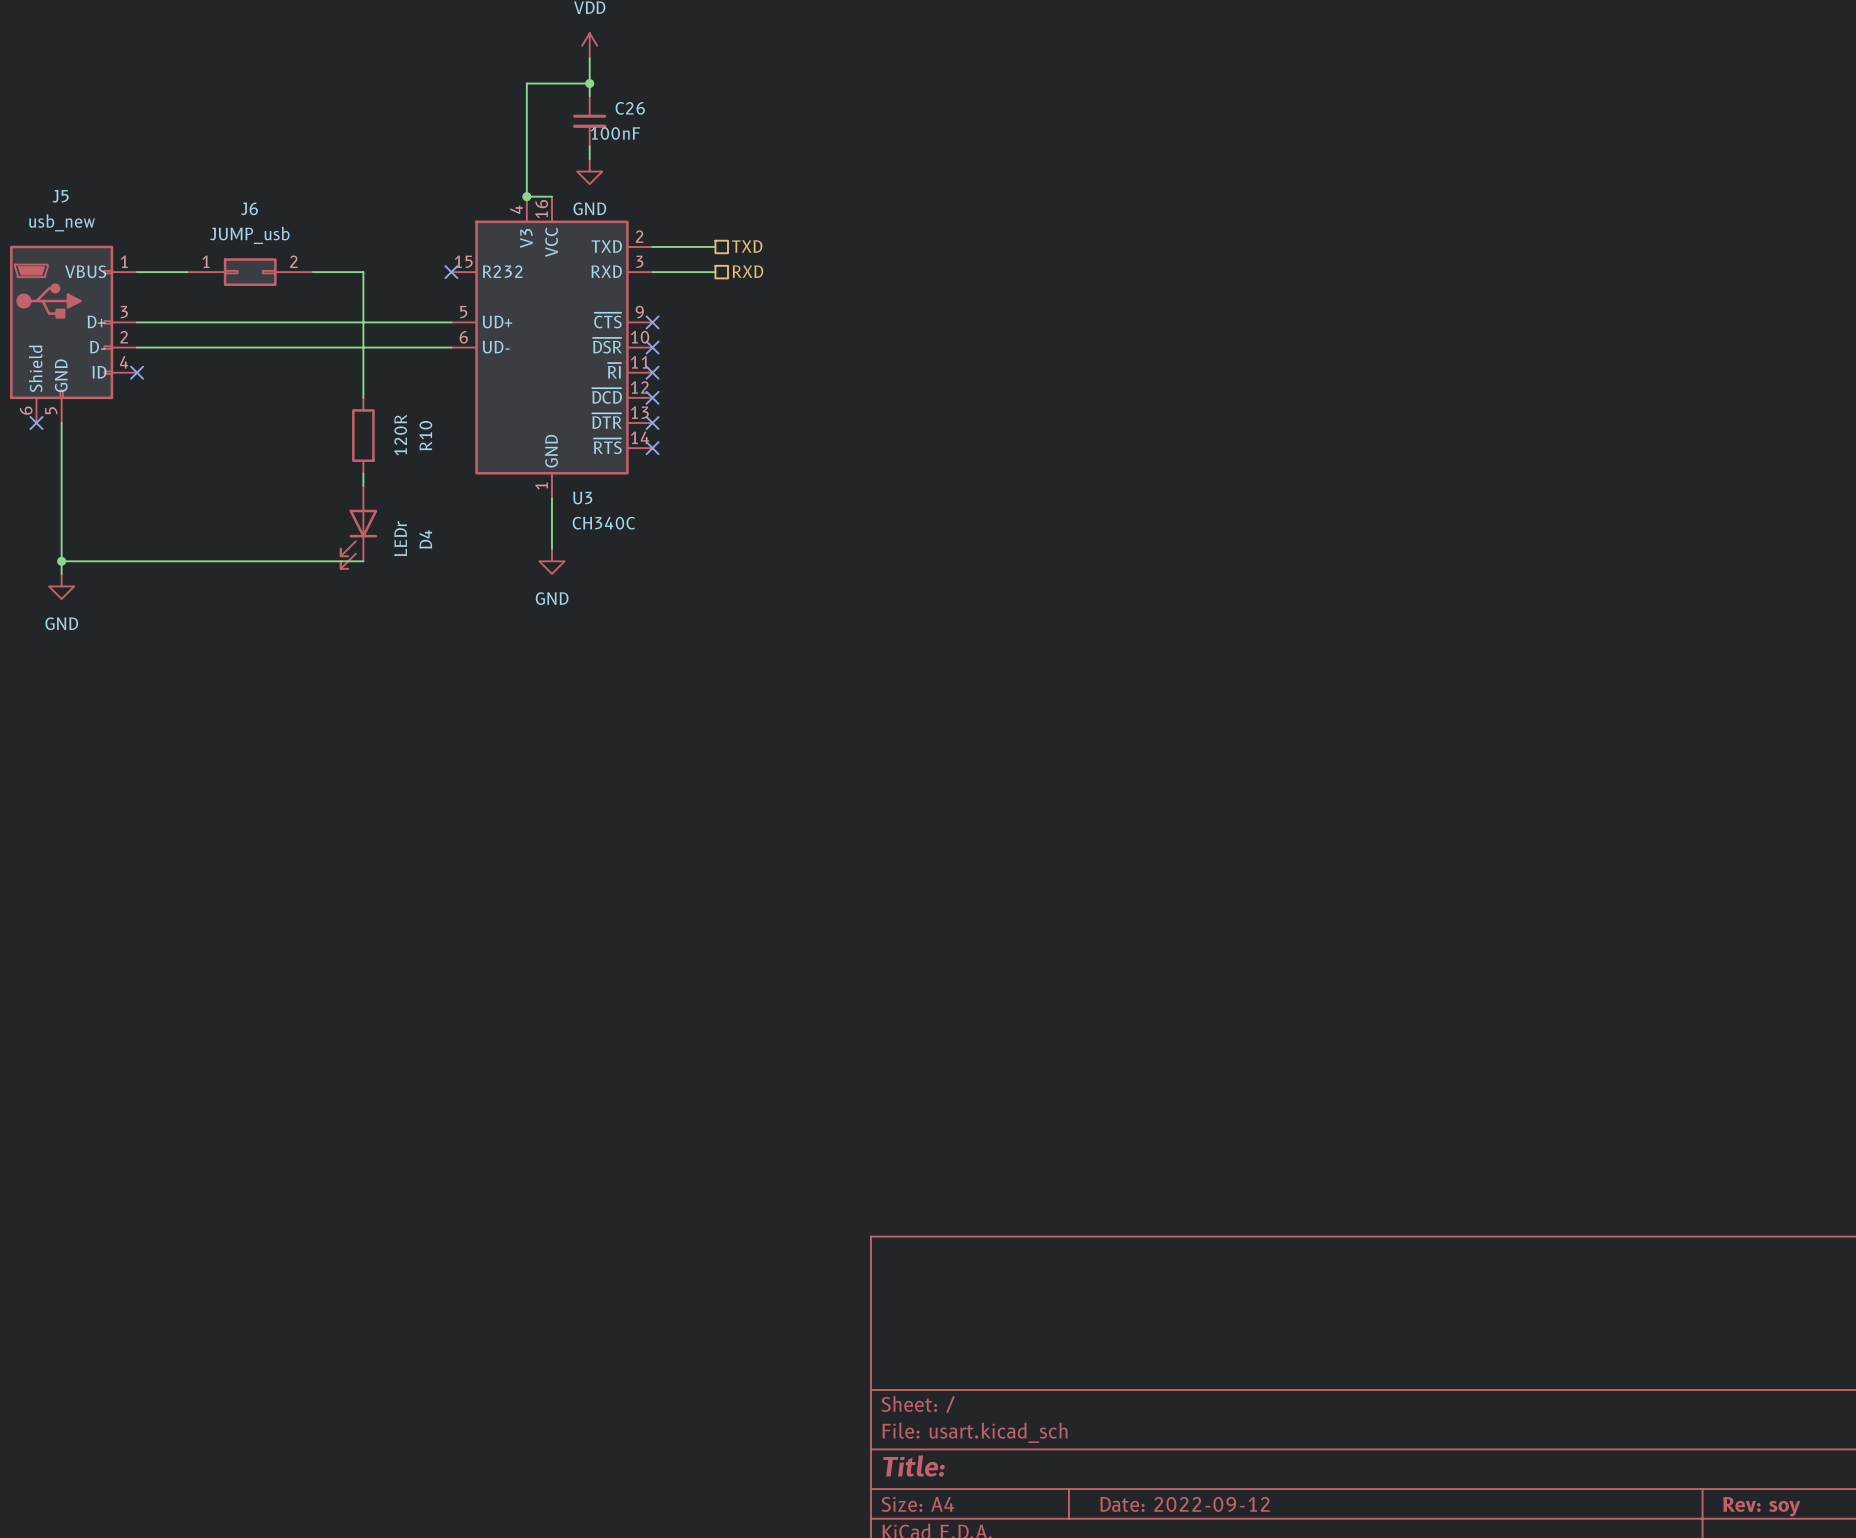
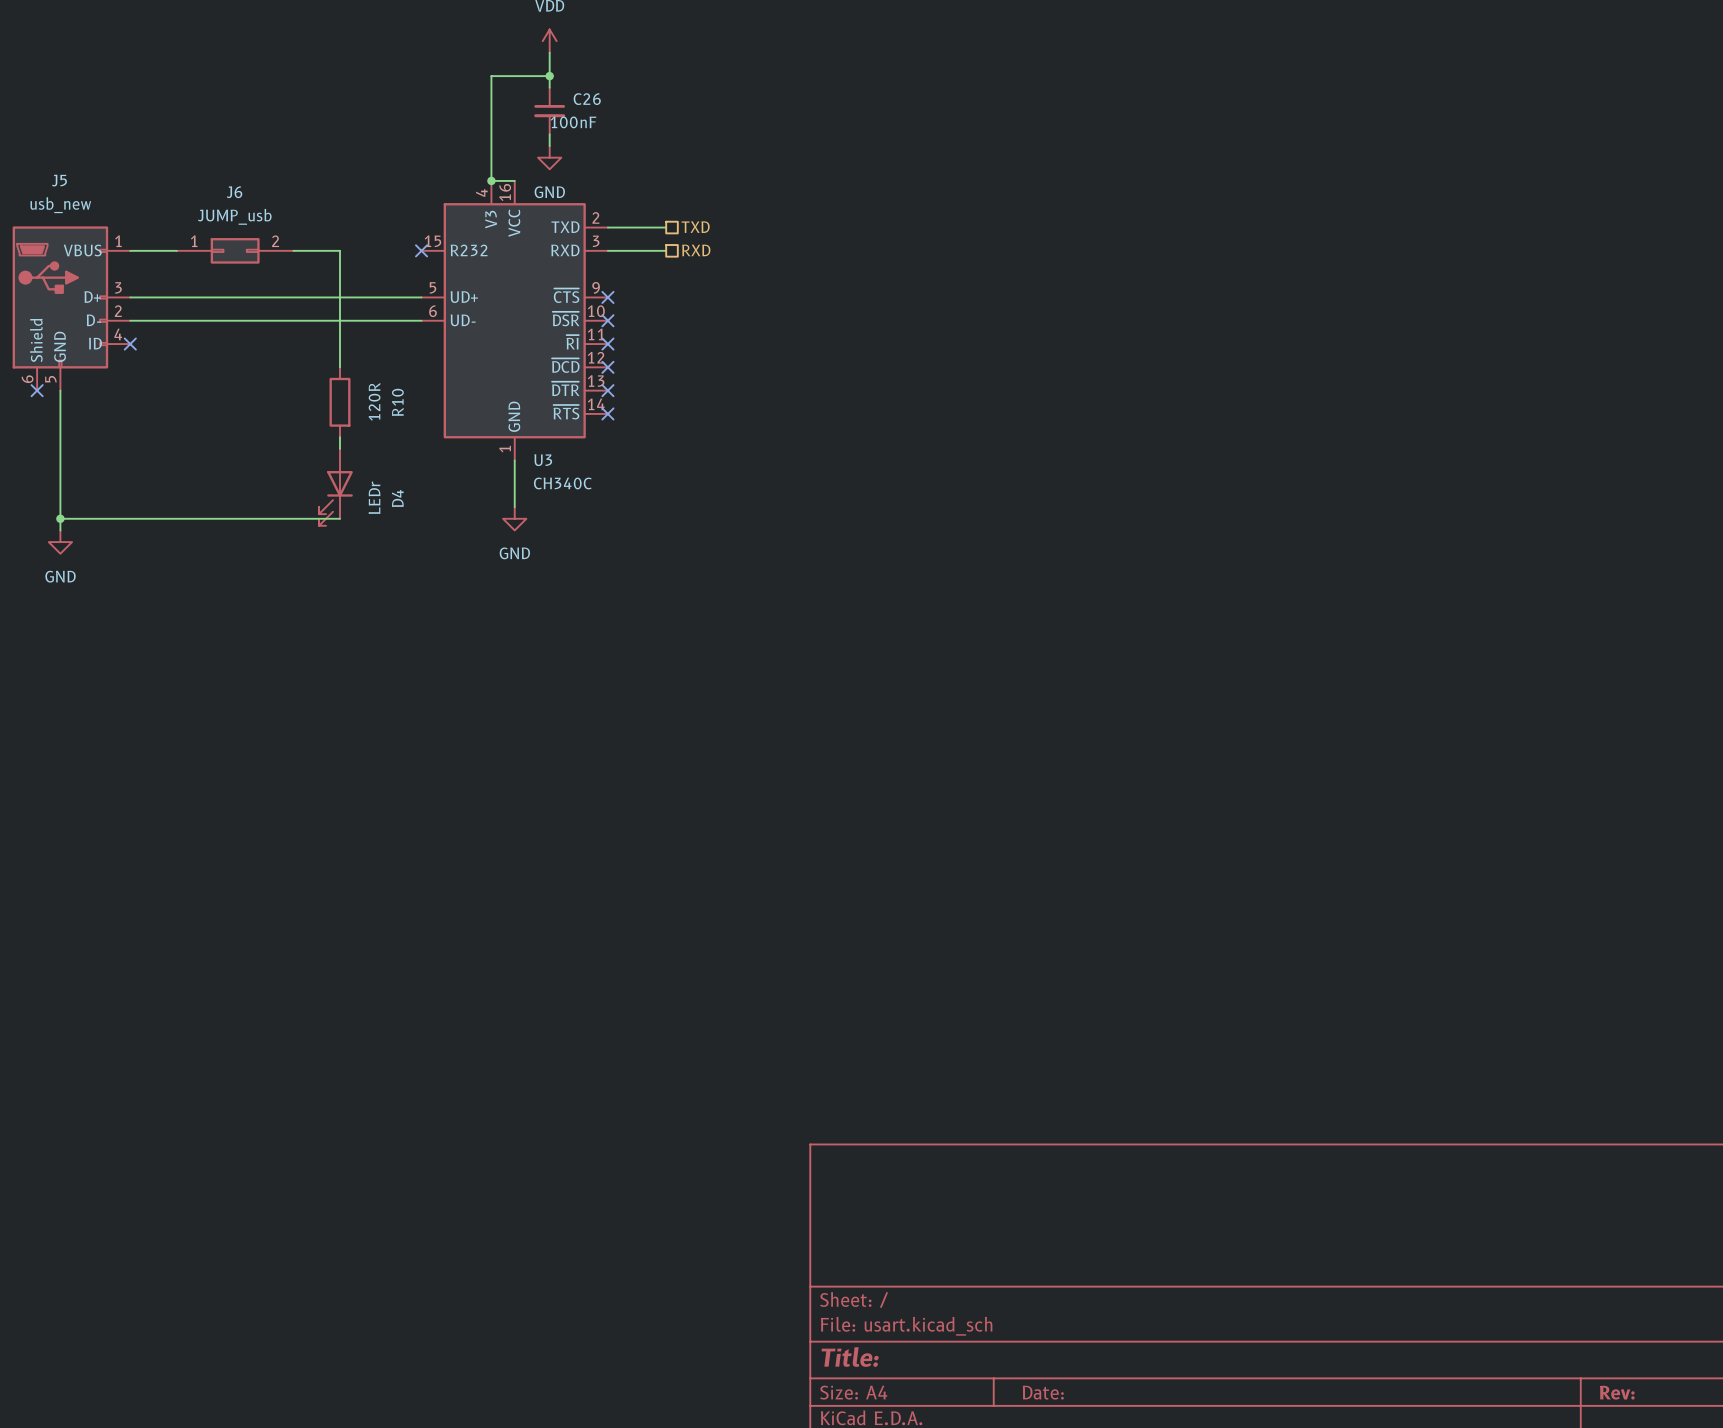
title block: Date: 2022-09-12 (1185, 1504) -> Date: (1043, 1392)
title block: Rev: soy (1761, 1506) -> Rev: (1617, 1392)

